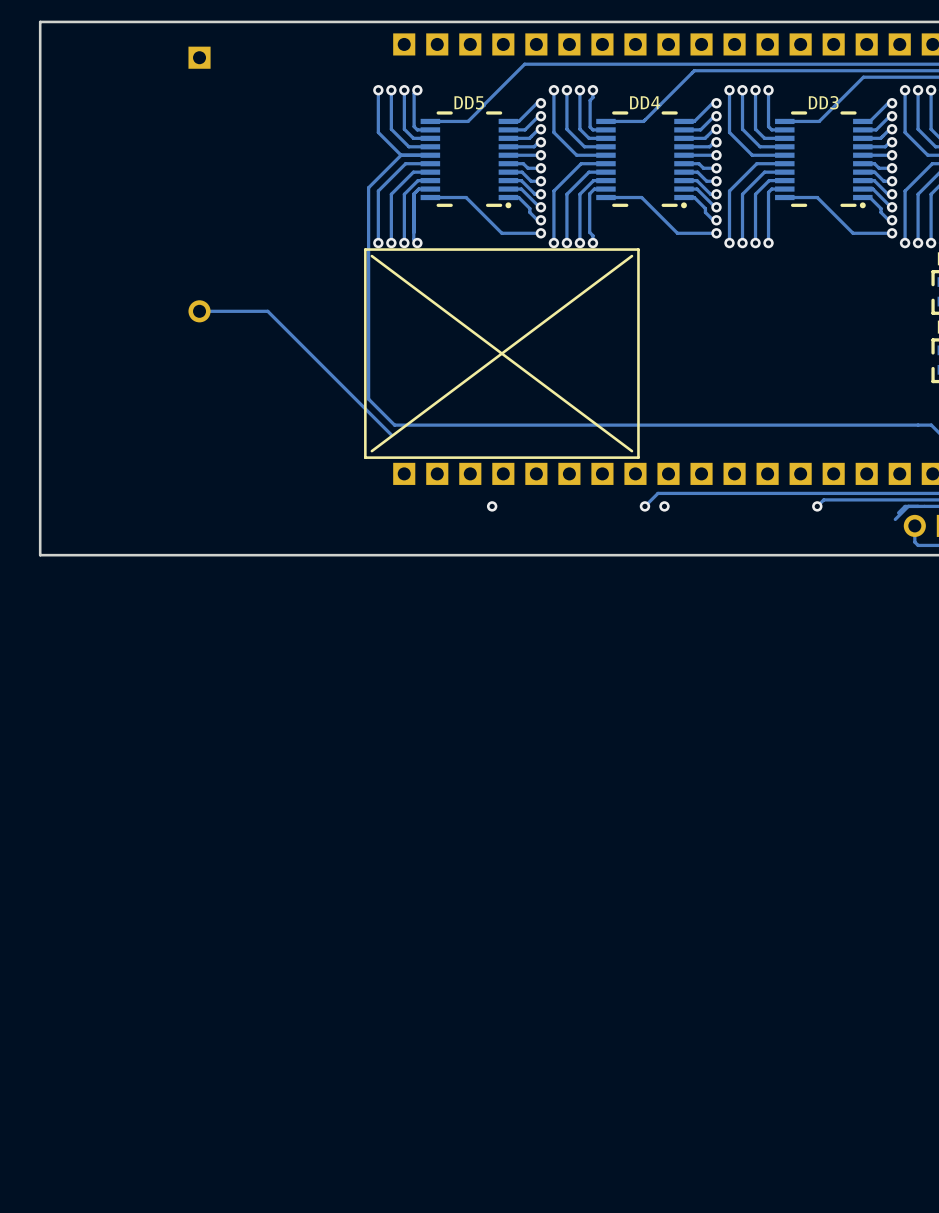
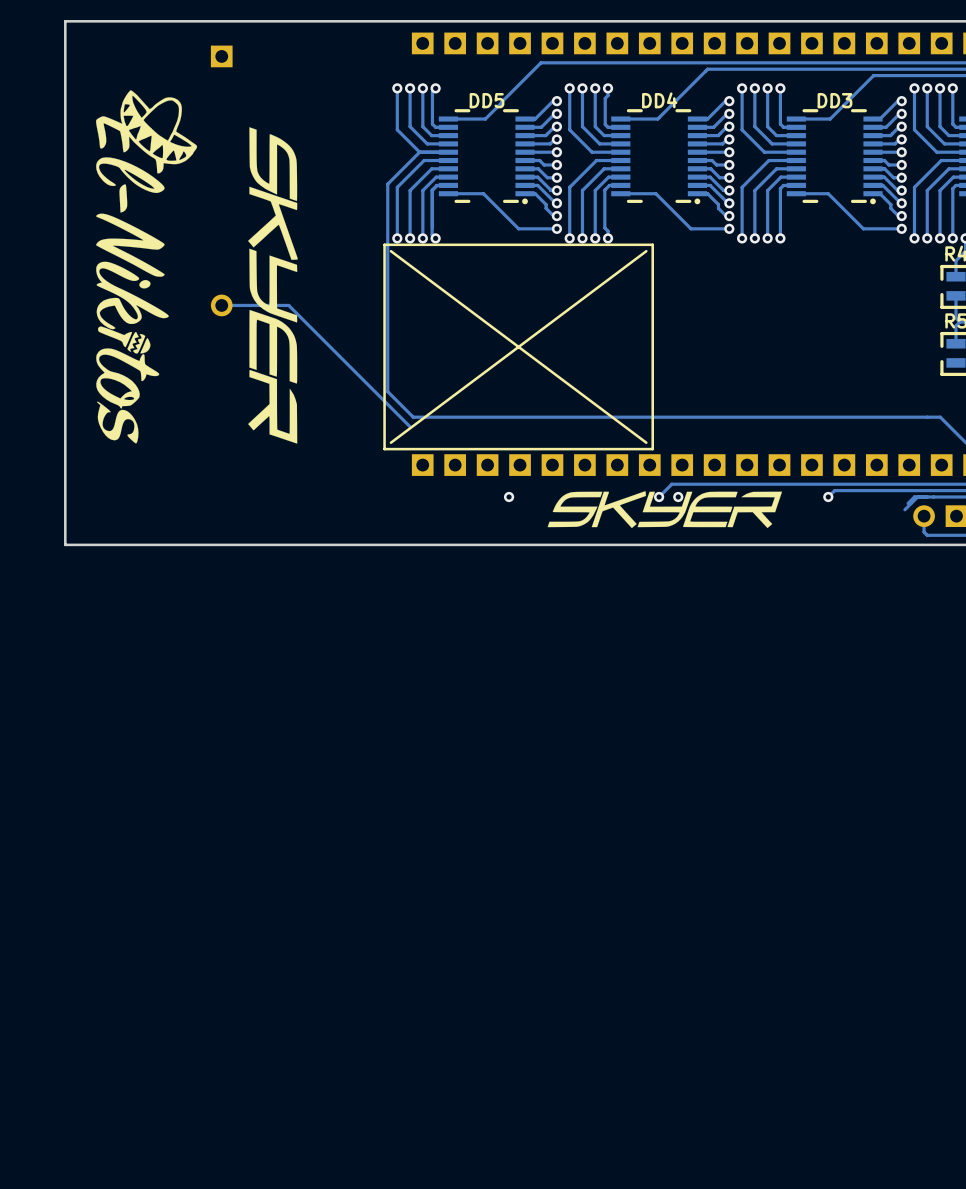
drawing: none -> [95, 90, 198, 444]
drawing: none -> [248, 127, 298, 444]
drawing: none -> [547, 491, 783, 529]

